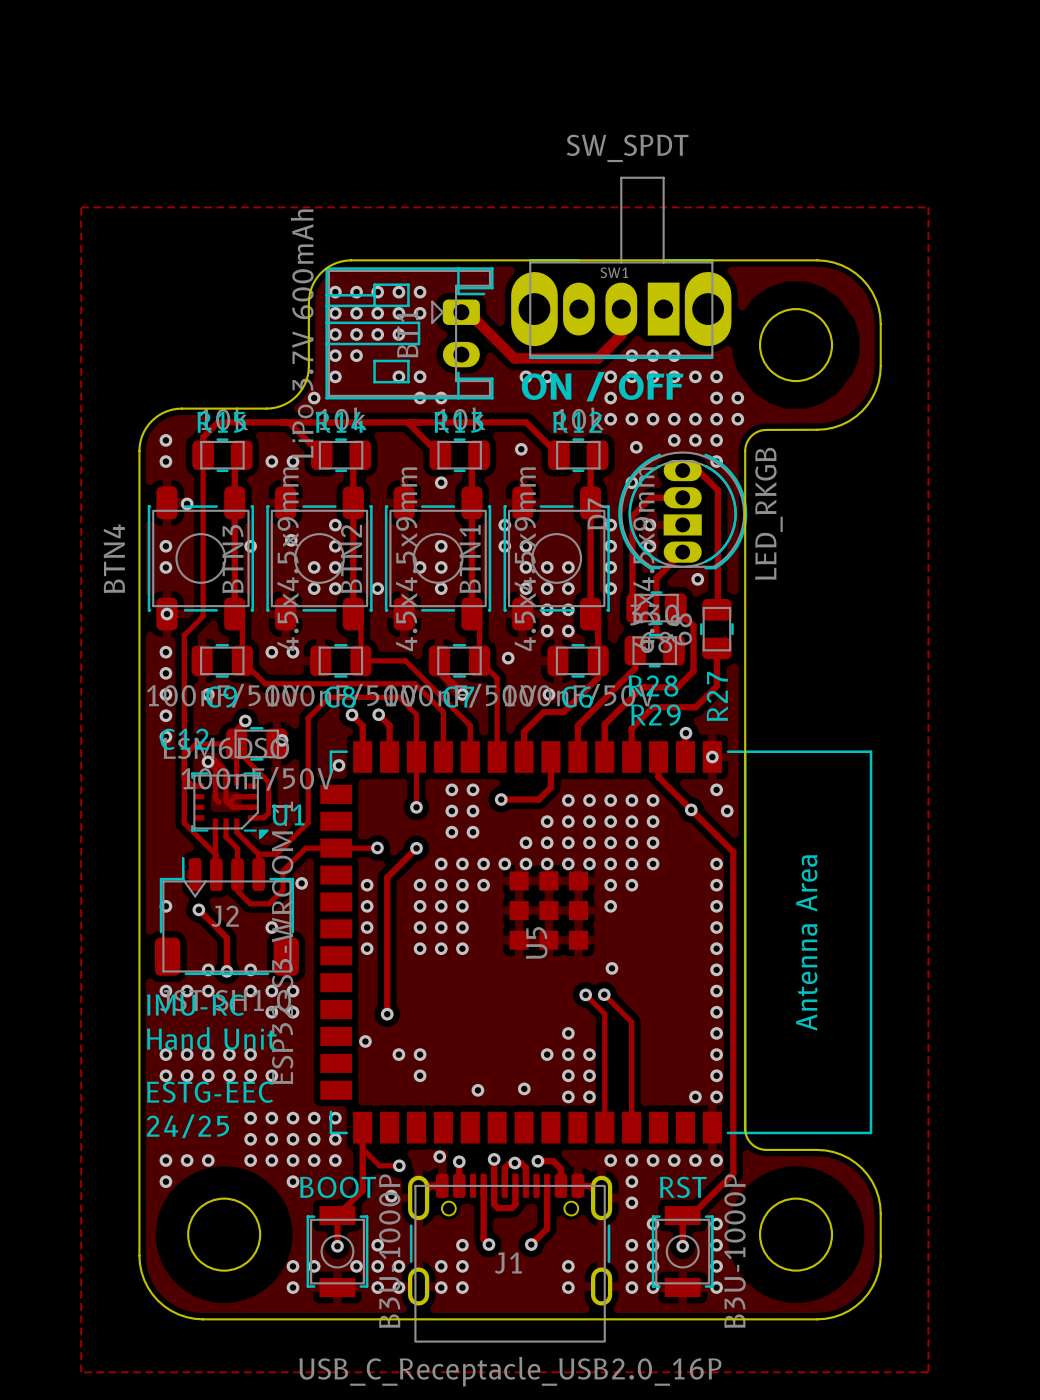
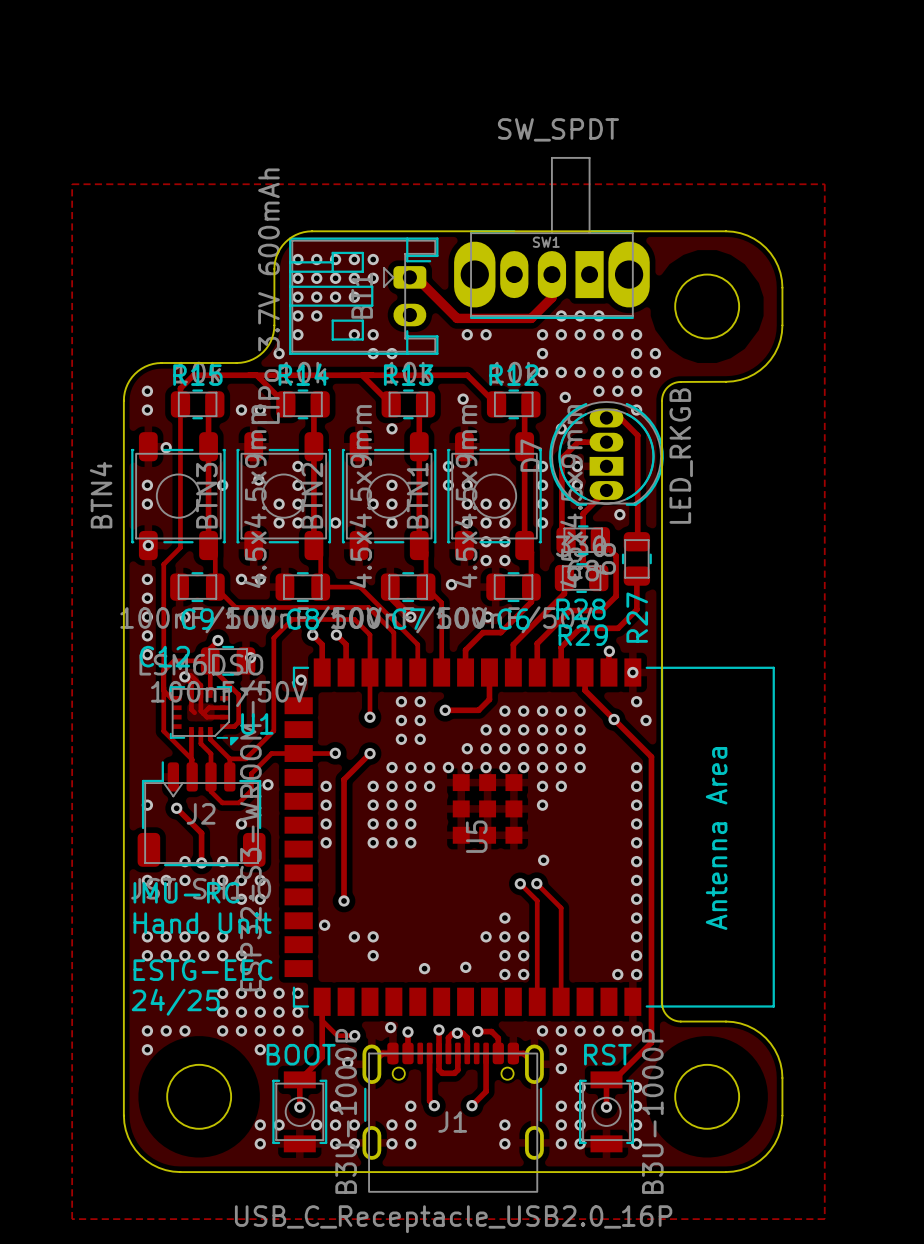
text: ON / OFF (602, 386) -> none

